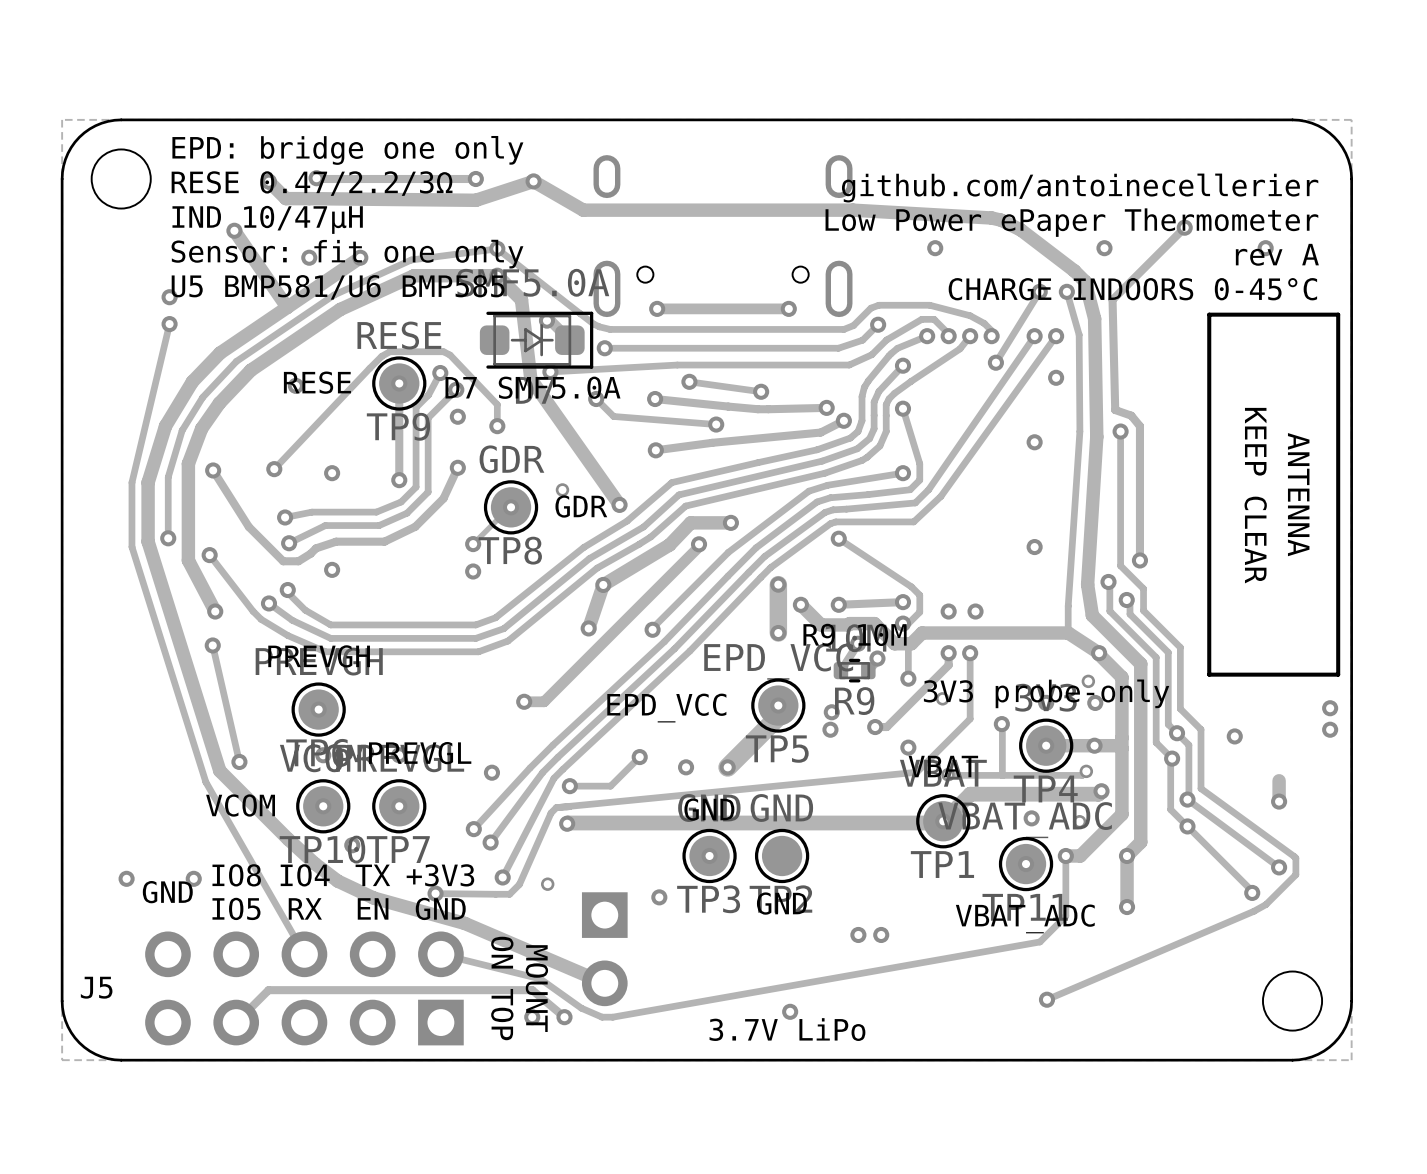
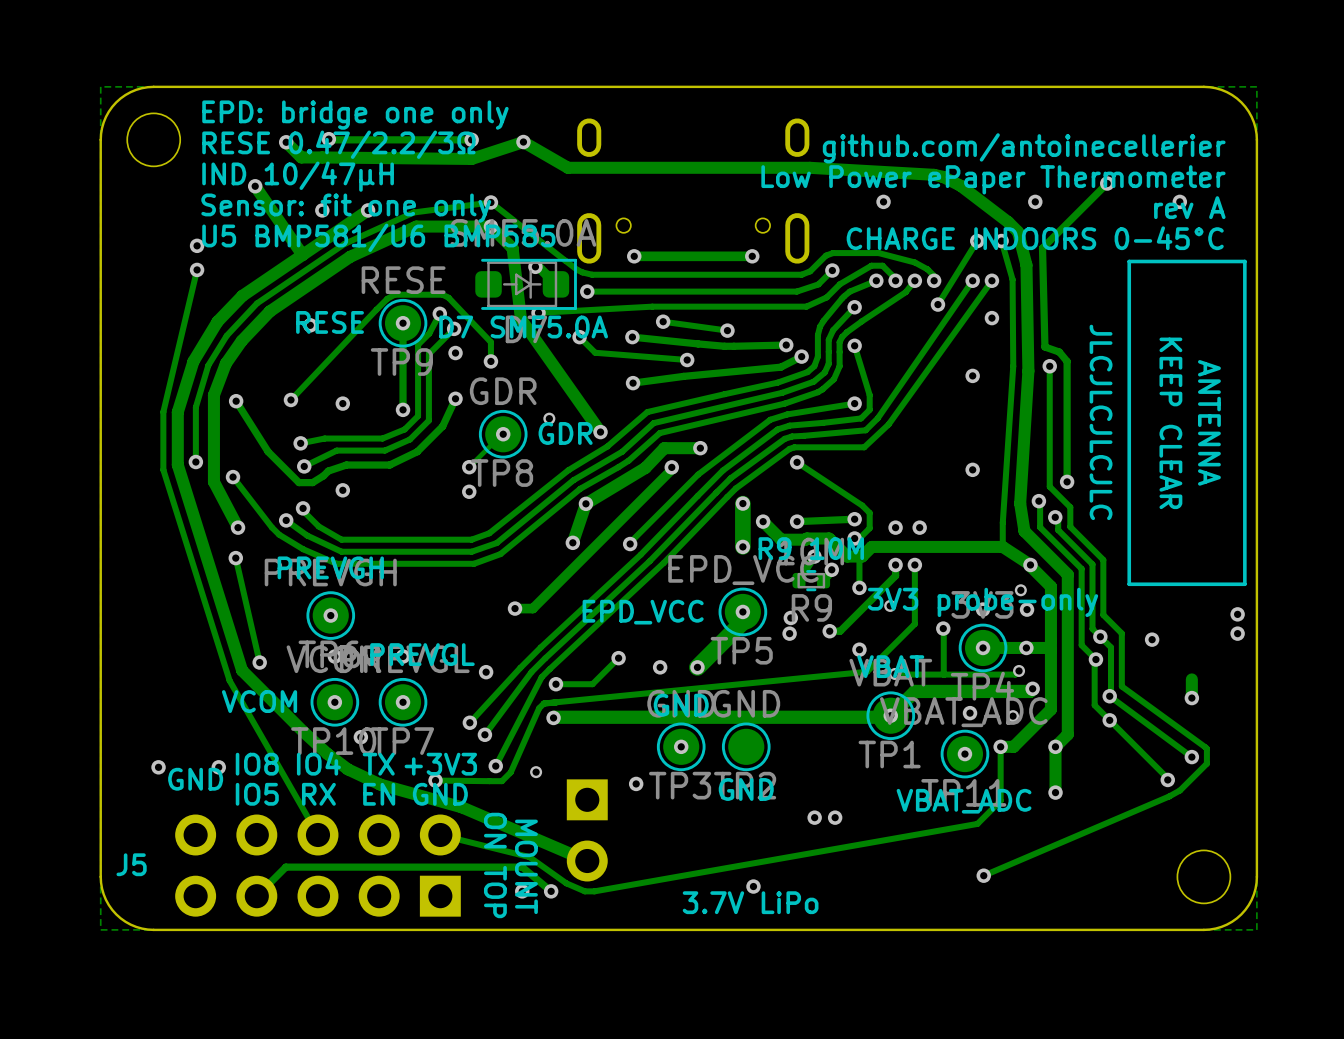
text: none -> JLCJLCJLCJLC (1101, 422)

